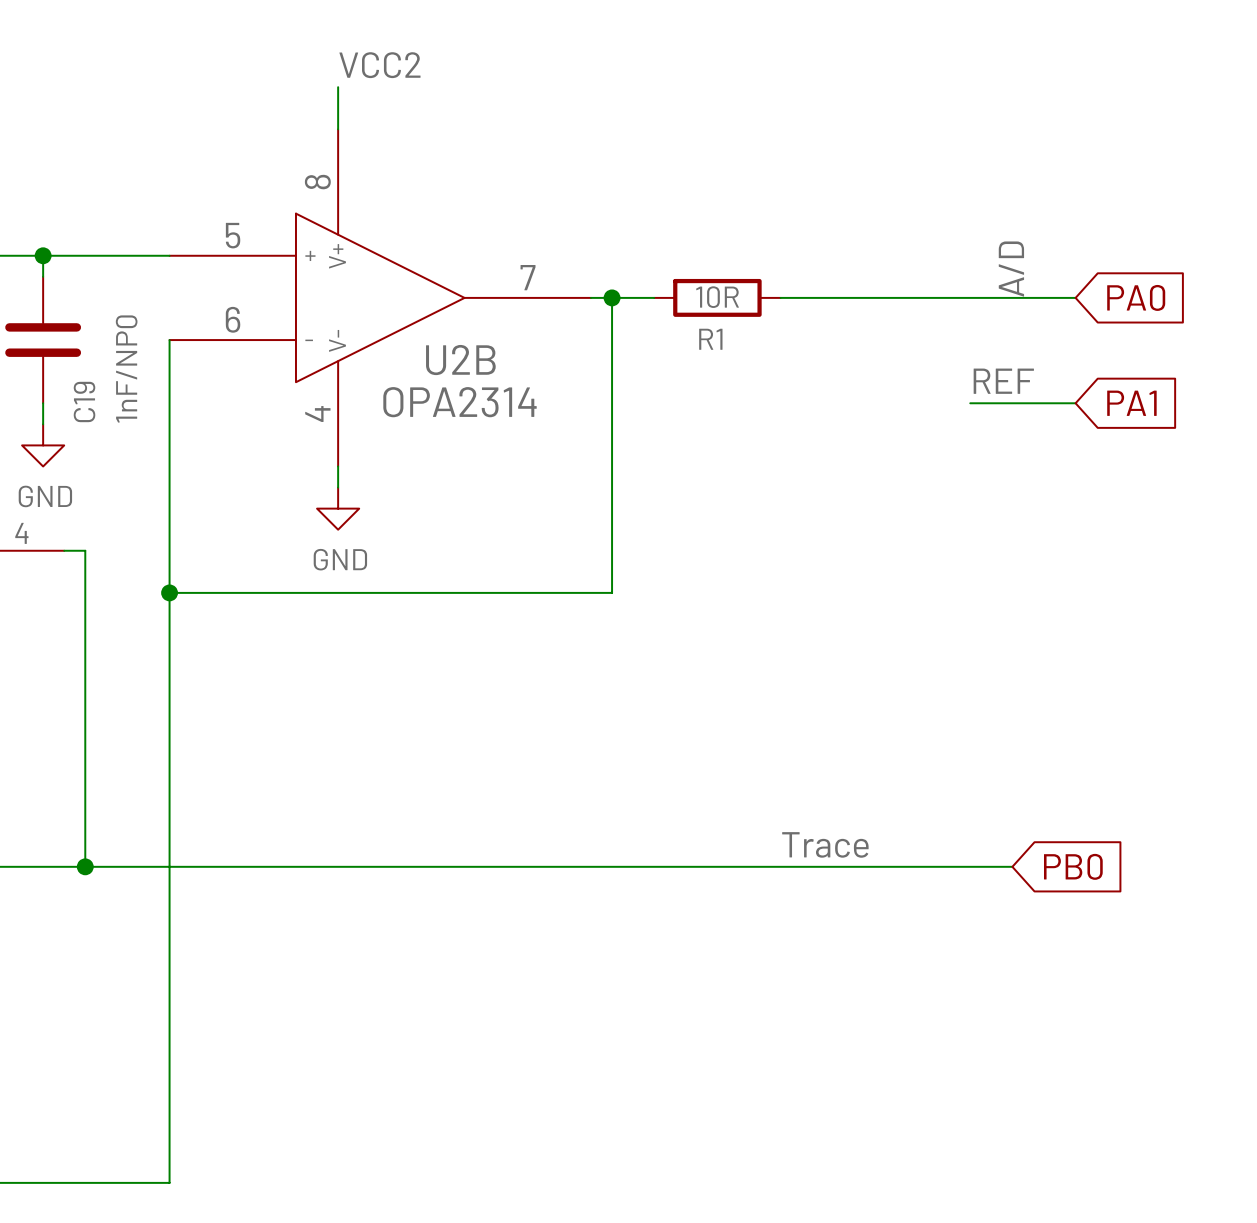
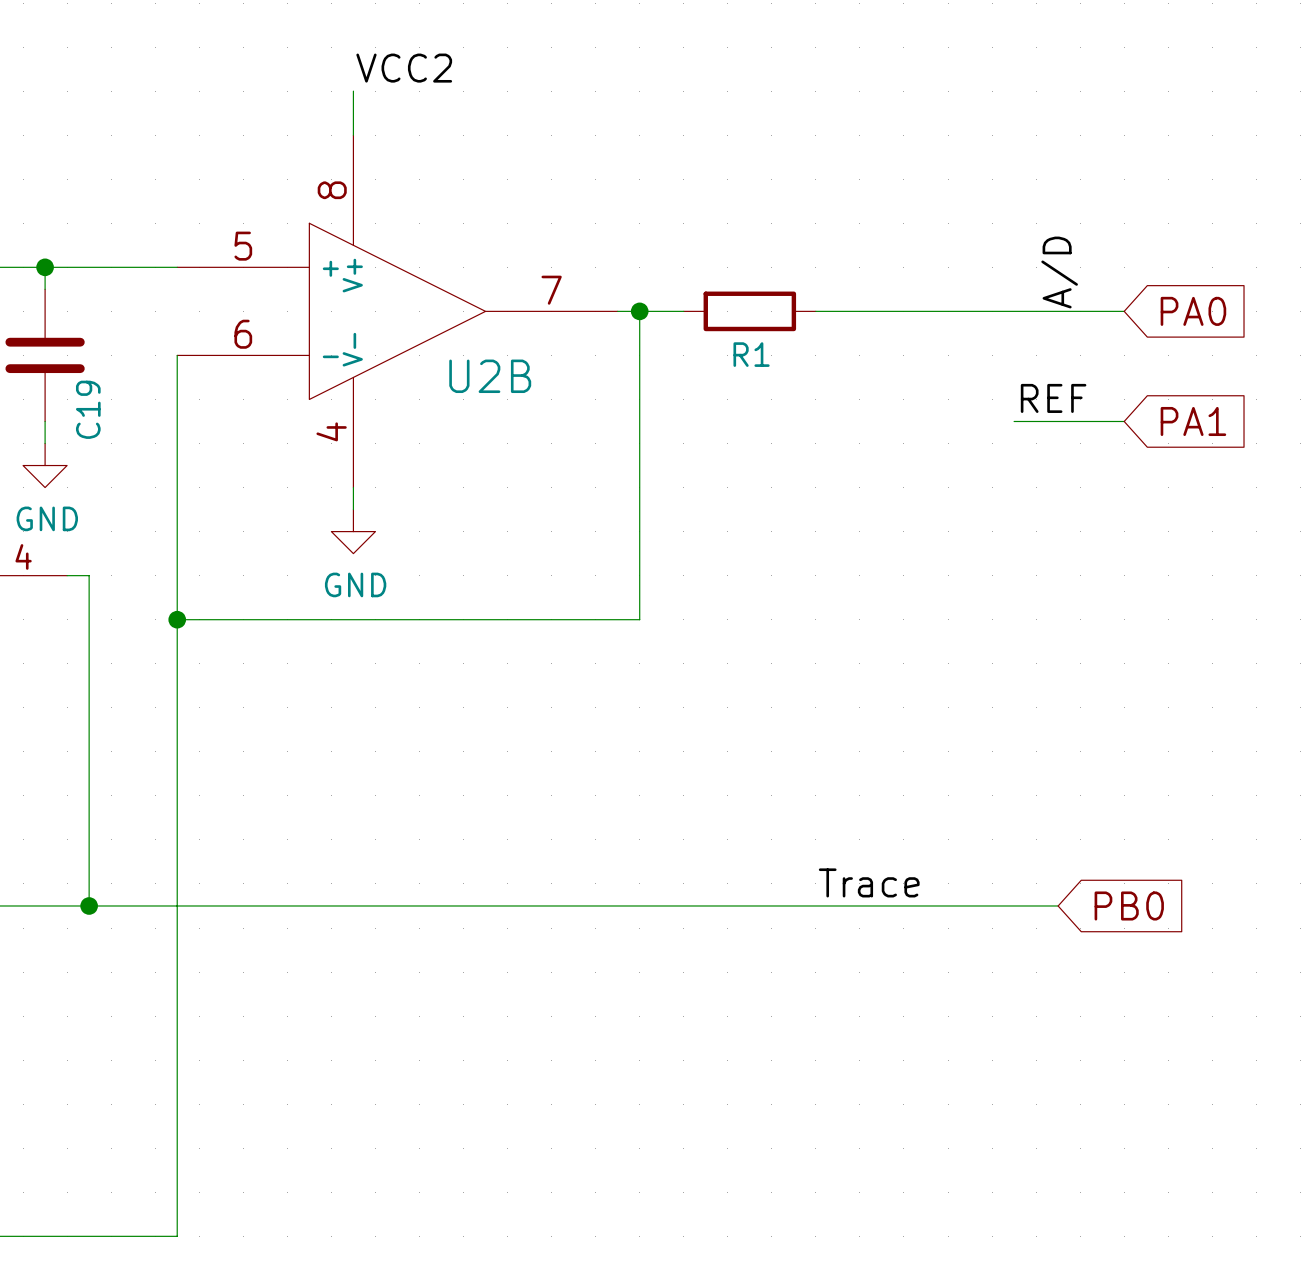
R1 value: 10R (717, 297) -> none
C19 value: 1nF/NP0 (126, 368) -> none
U2B value: OPA2314 (460, 402) -> none

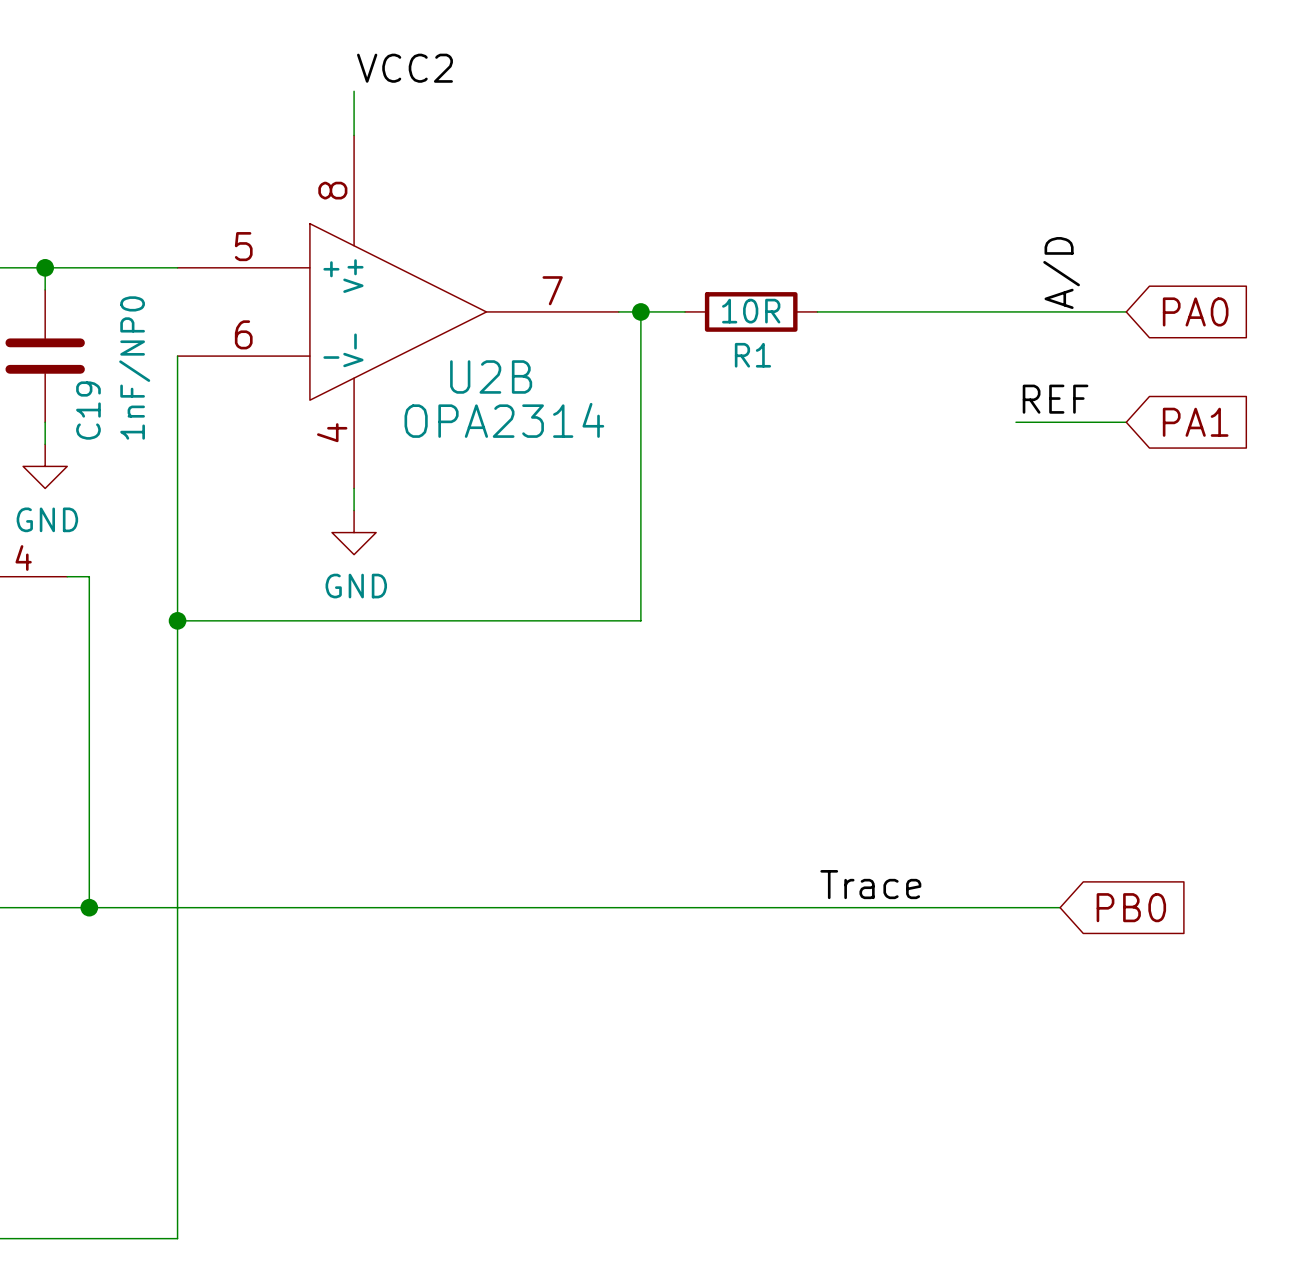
R1 value: none -> 10R (751, 311)
C19 value: none -> 1nF/NP0 (134, 367)
U2B value: none -> OPA2314 (504, 420)

